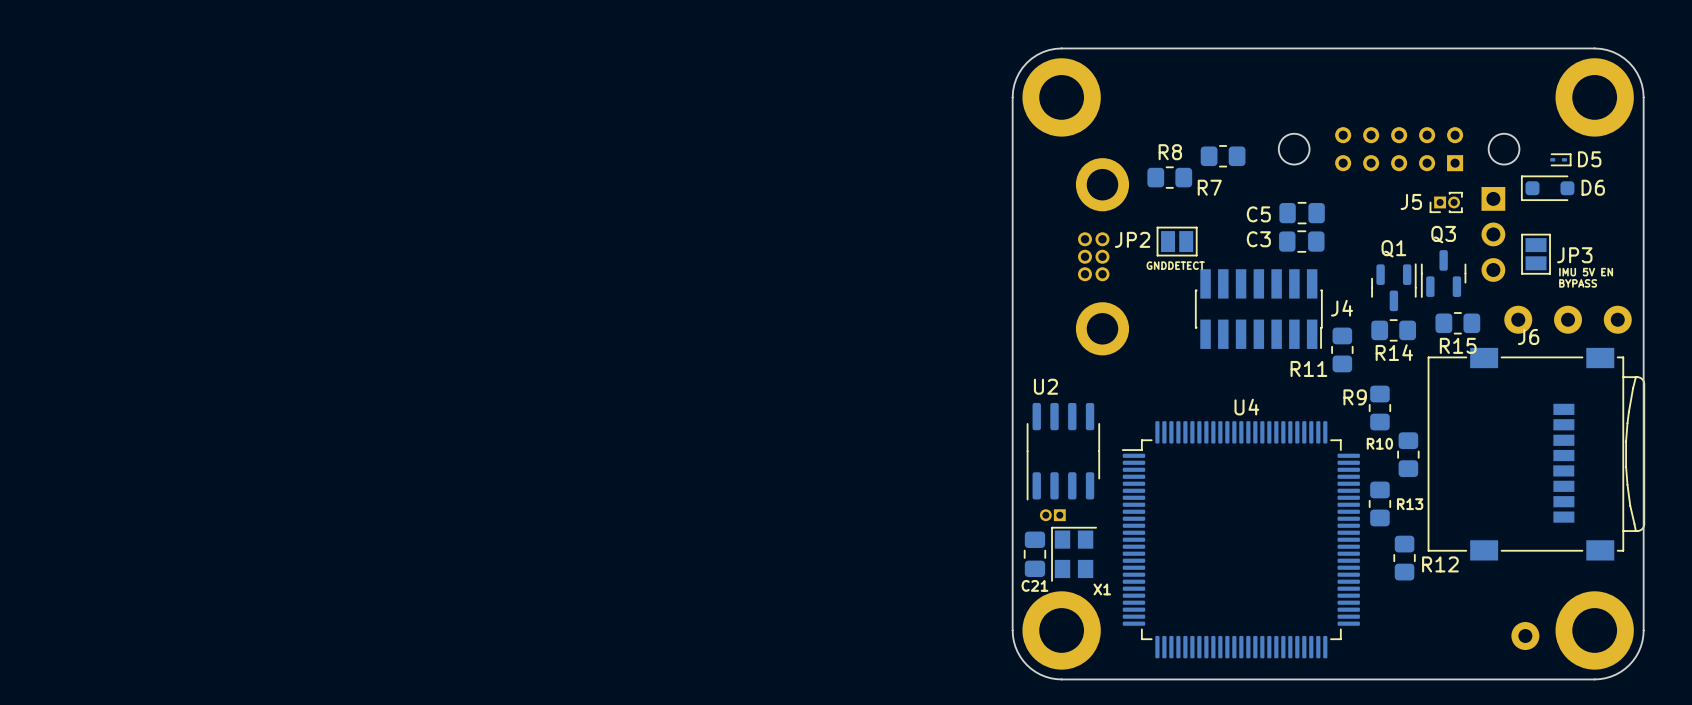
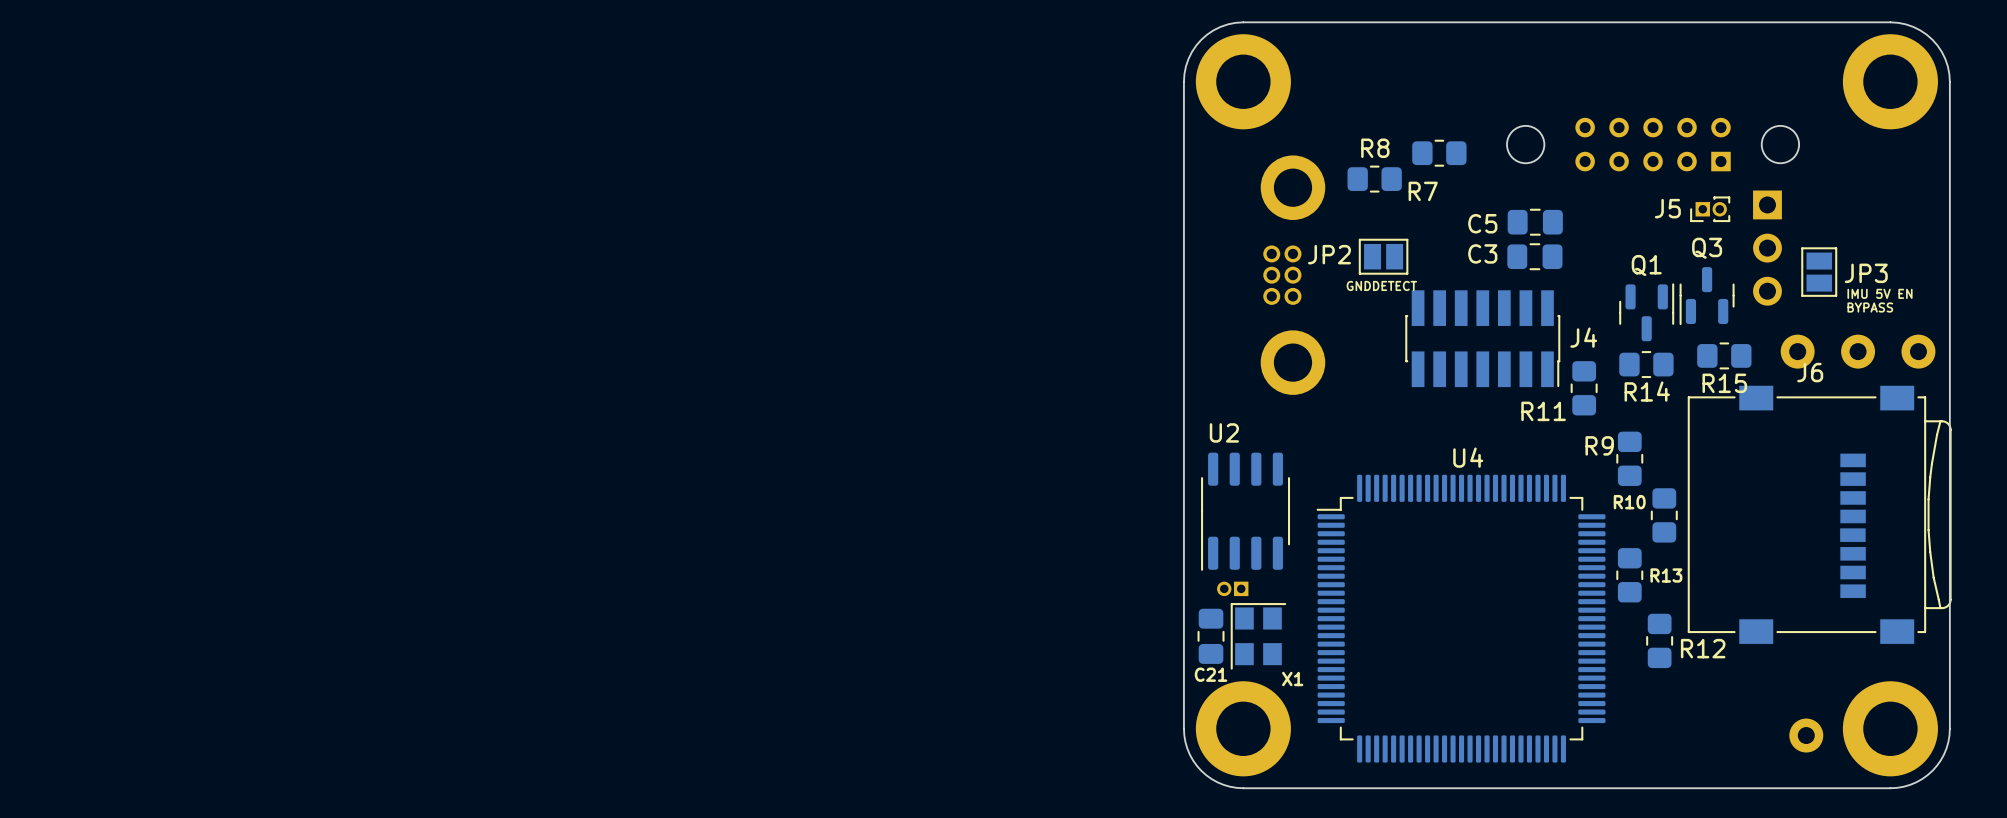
D5: (1560, 159) -> none
D6: (1547, 188) -> none

